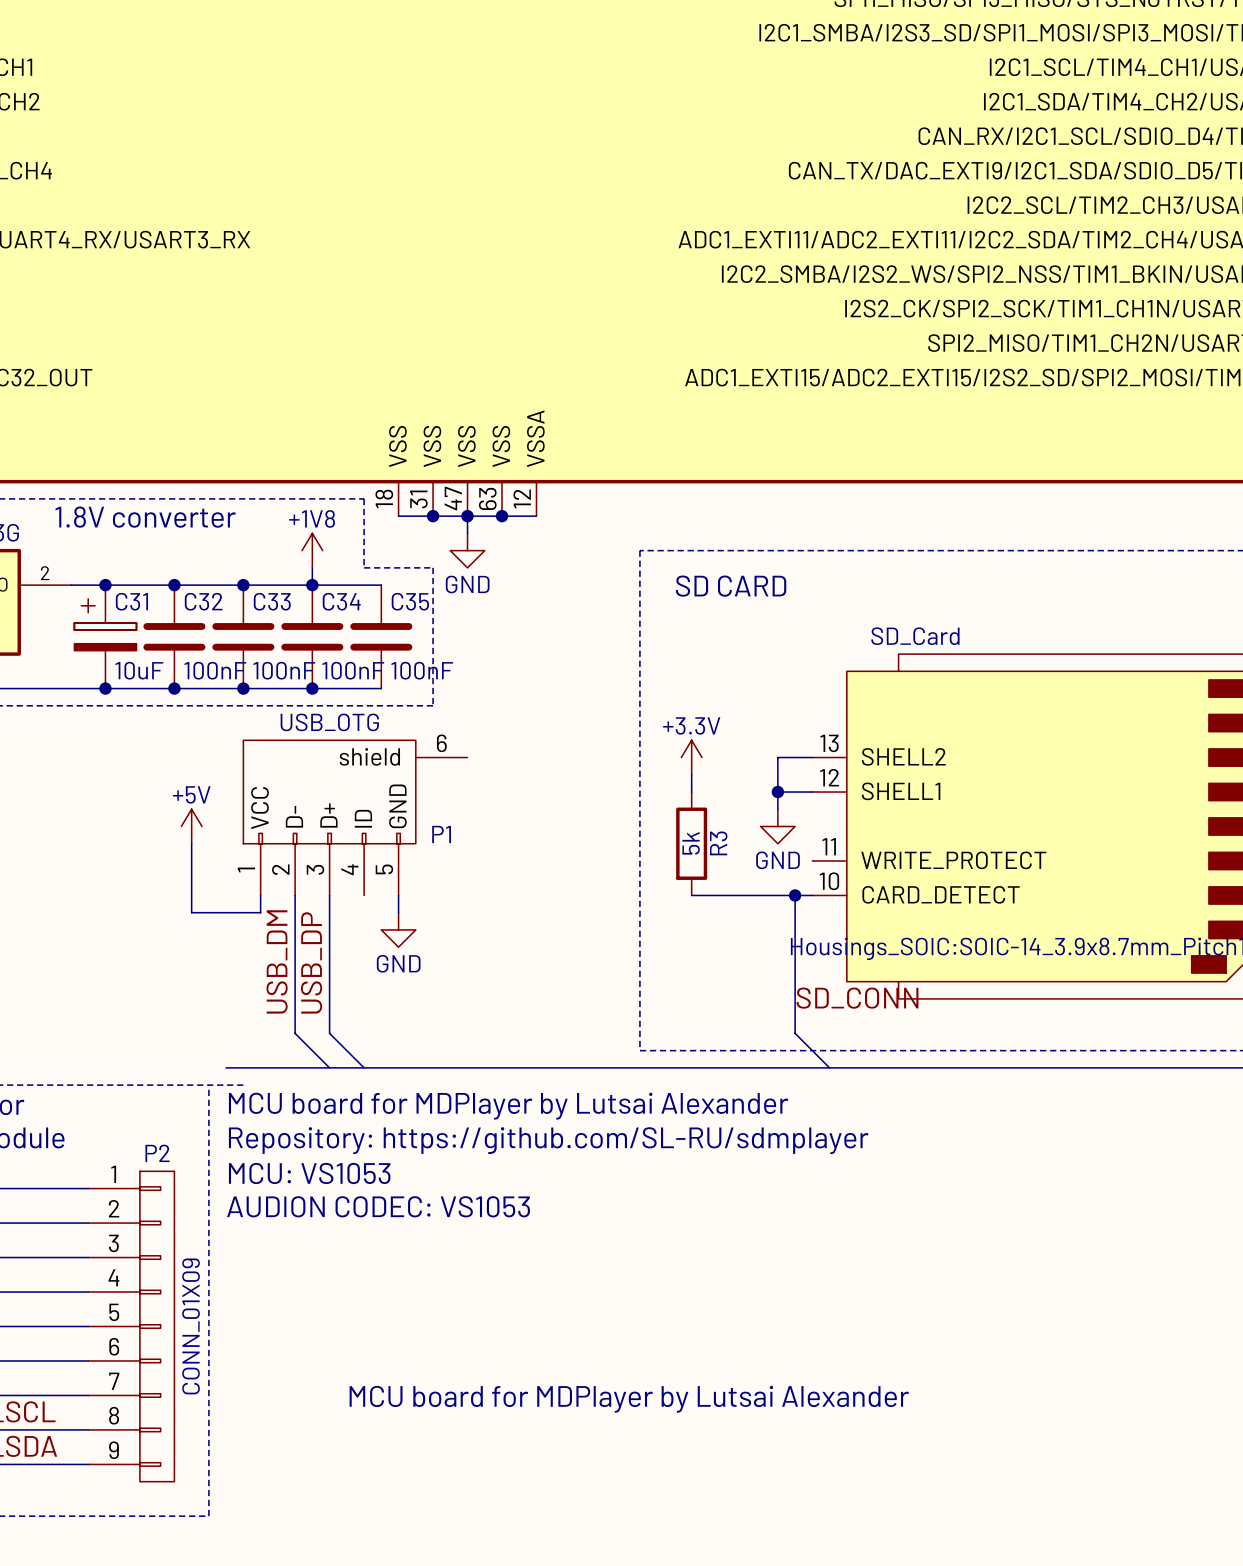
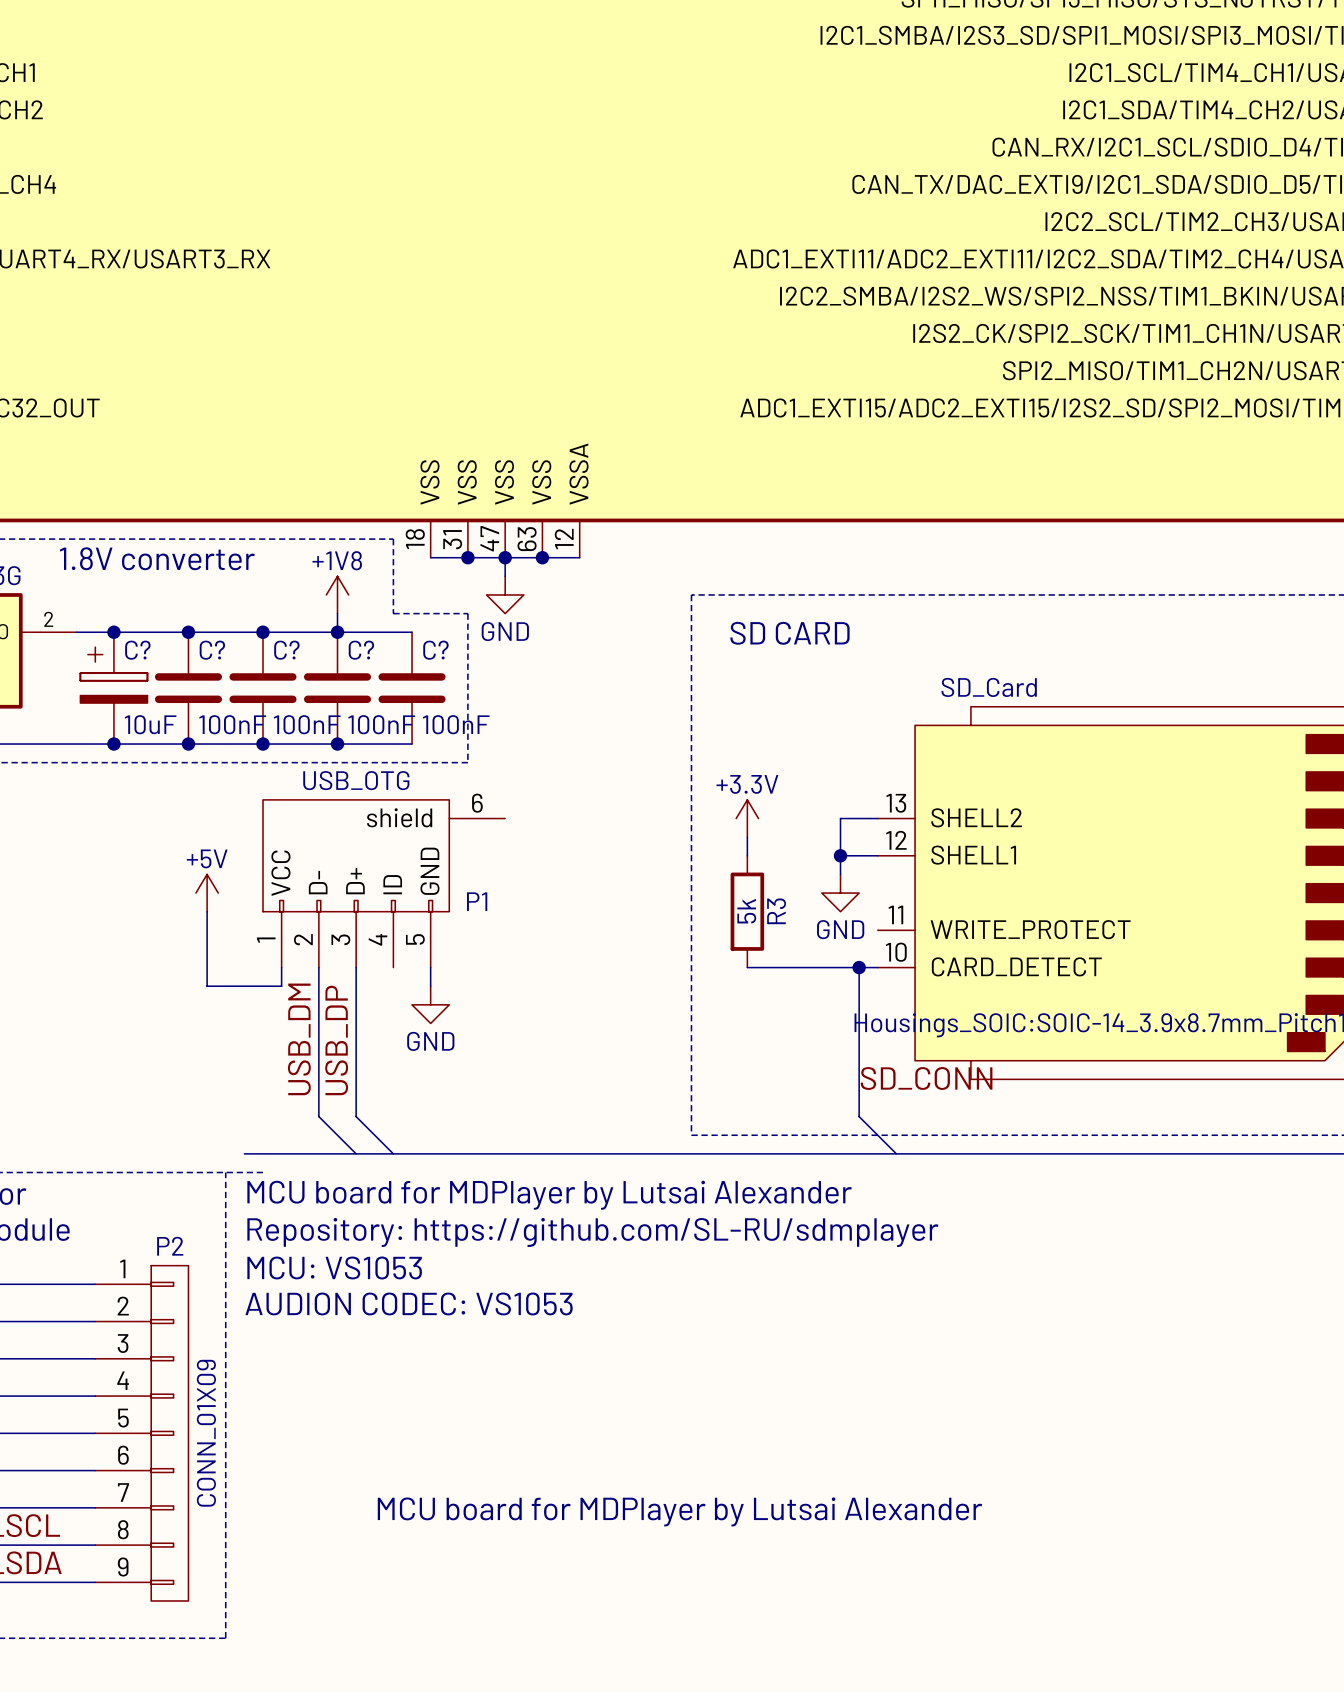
C31 name: C31 (131, 601) -> C? (137, 650)
C32 name: C32 (203, 601) -> C? (212, 650)
C33 name: C33 (272, 601) -> C? (286, 650)
C34 name: C34 (341, 601) -> C? (361, 650)
C35 name: C35 (410, 601) -> C? (435, 650)

